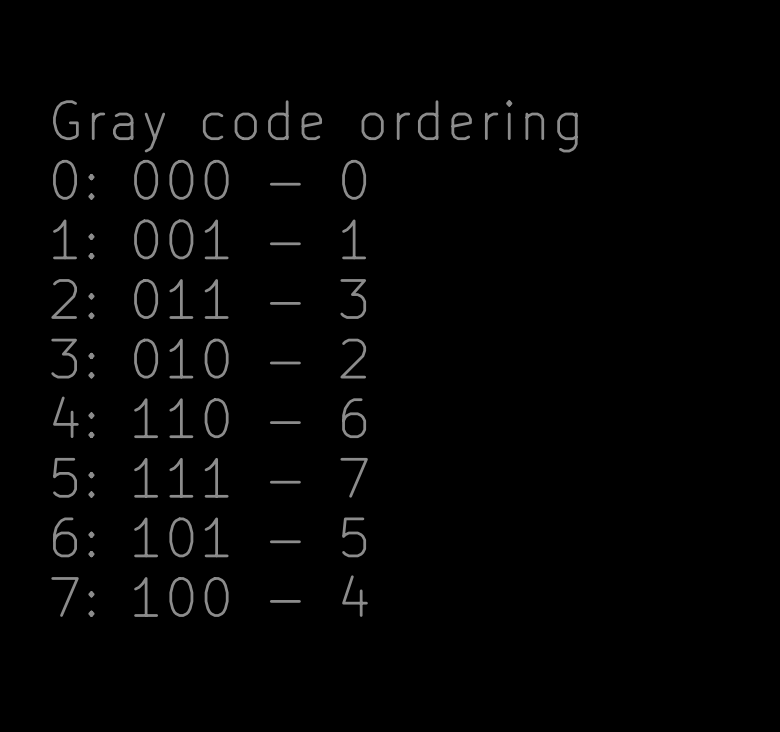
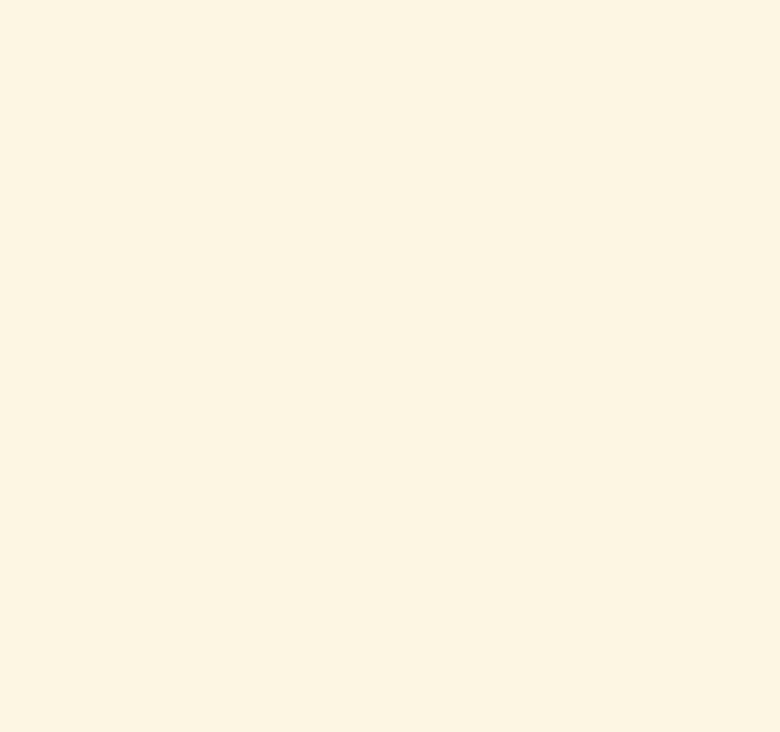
text: Gray code ordering (315, 126) -> none
text: 0: 000 - 0 (209, 179) -> none
text: 1: 001 - 1 (209, 239) -> none
text: 2: 011 - 3 (208, 298) -> none
text: 3: 010 - 2 (208, 358) -> none
text: 4: 110 - 6 (209, 417) -> none
text: 5: 111 - 7 (210, 477) -> none
text: 6: 101 - 5 (209, 537) -> none
text: 7: 100 - 4 (209, 596) -> none

